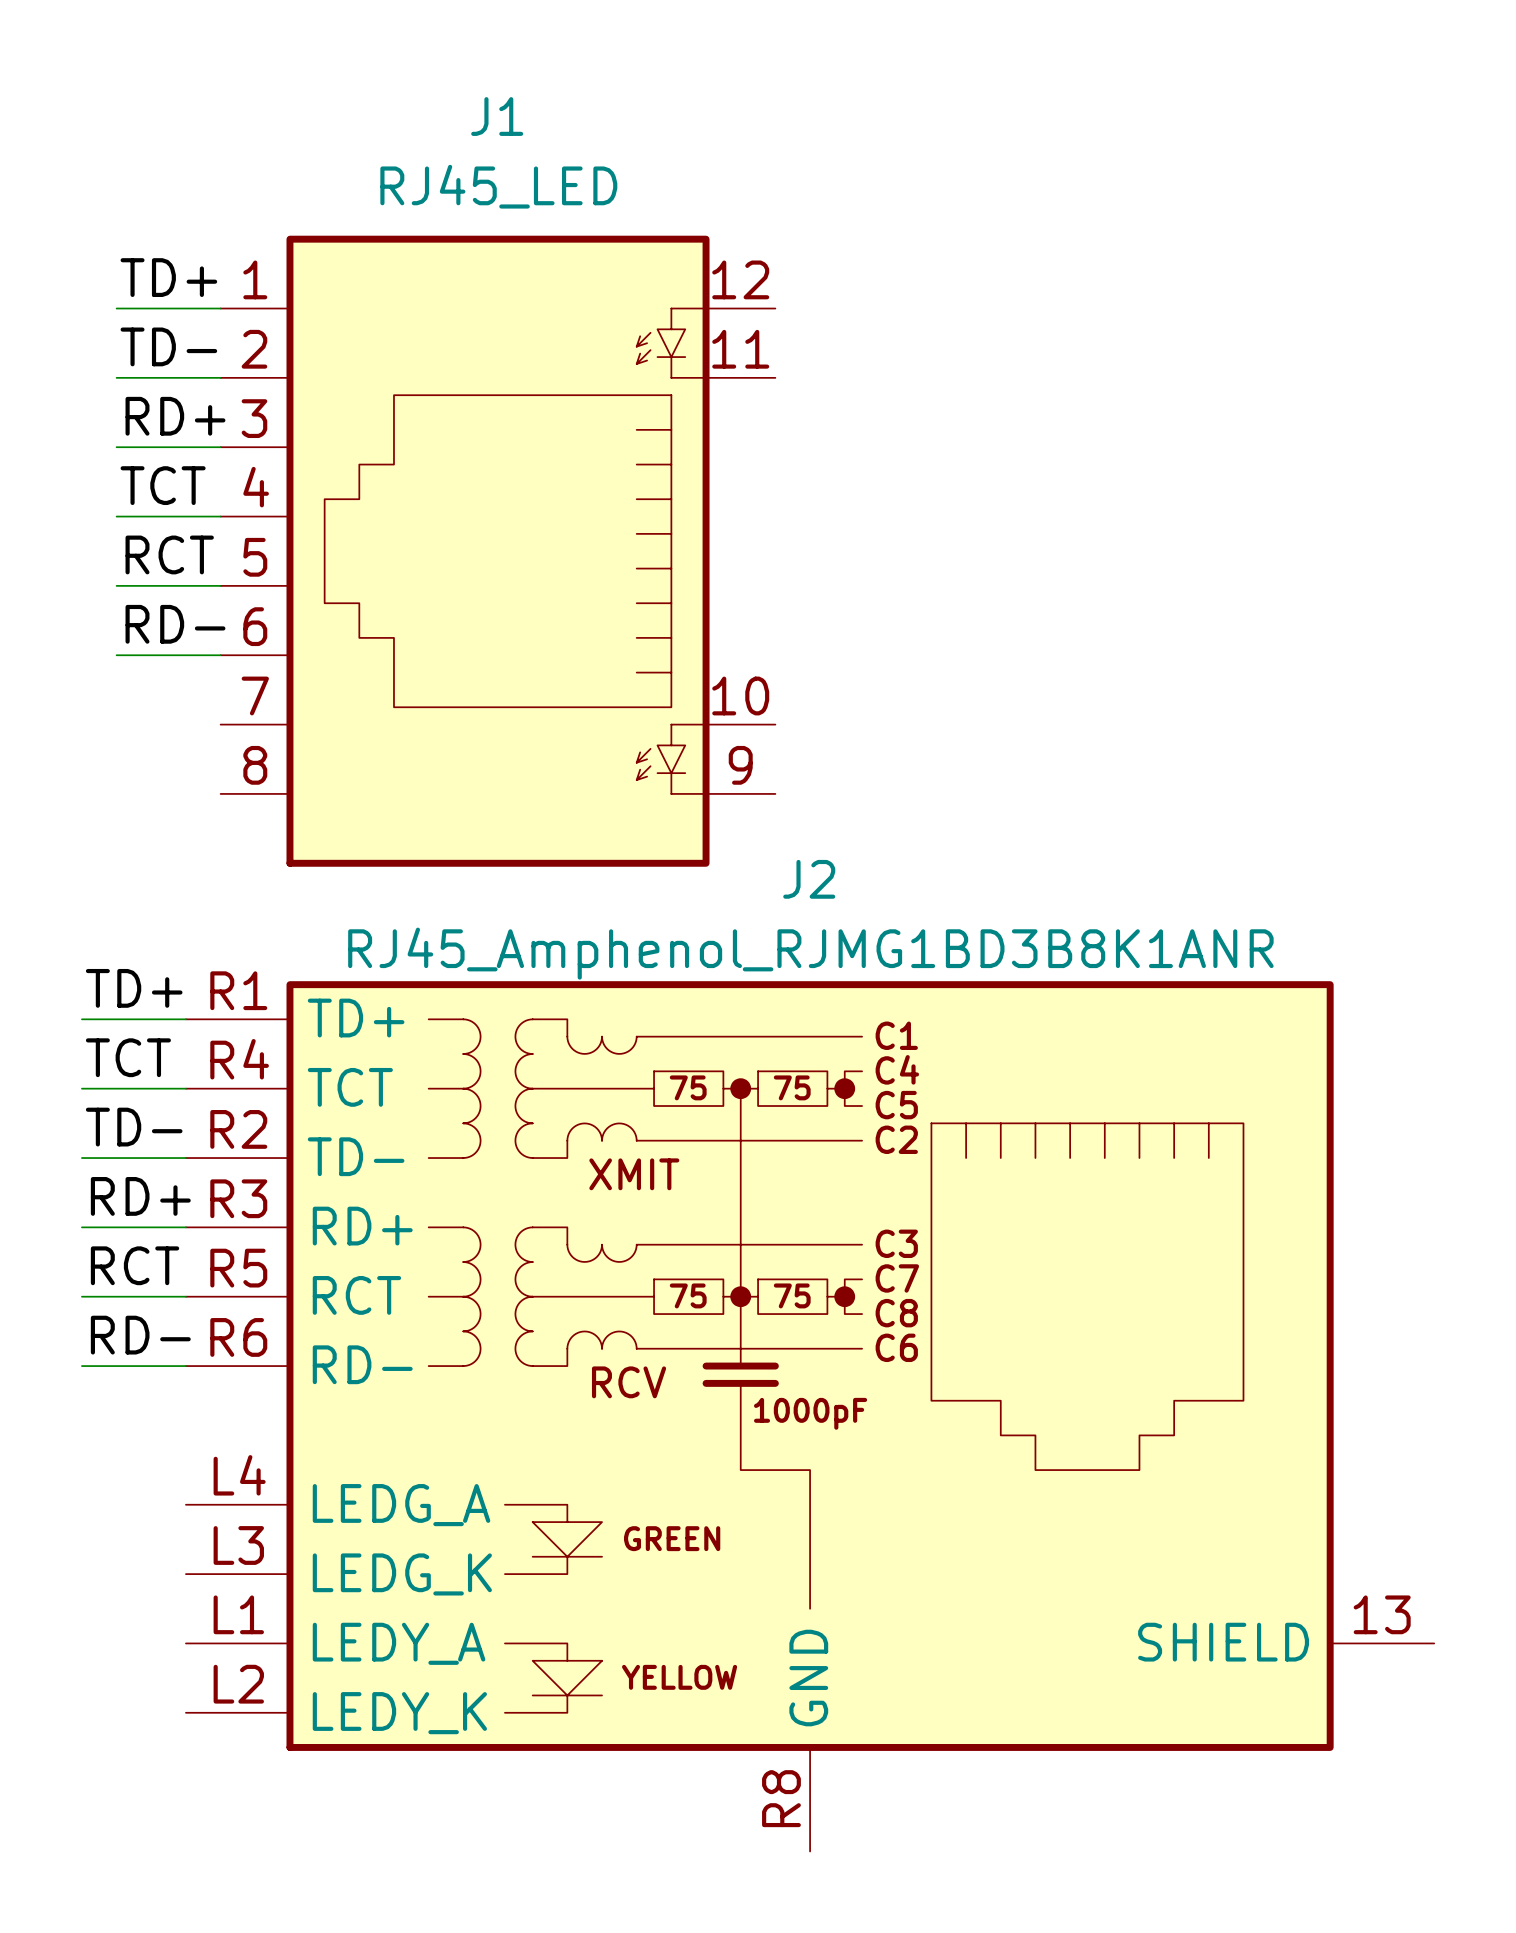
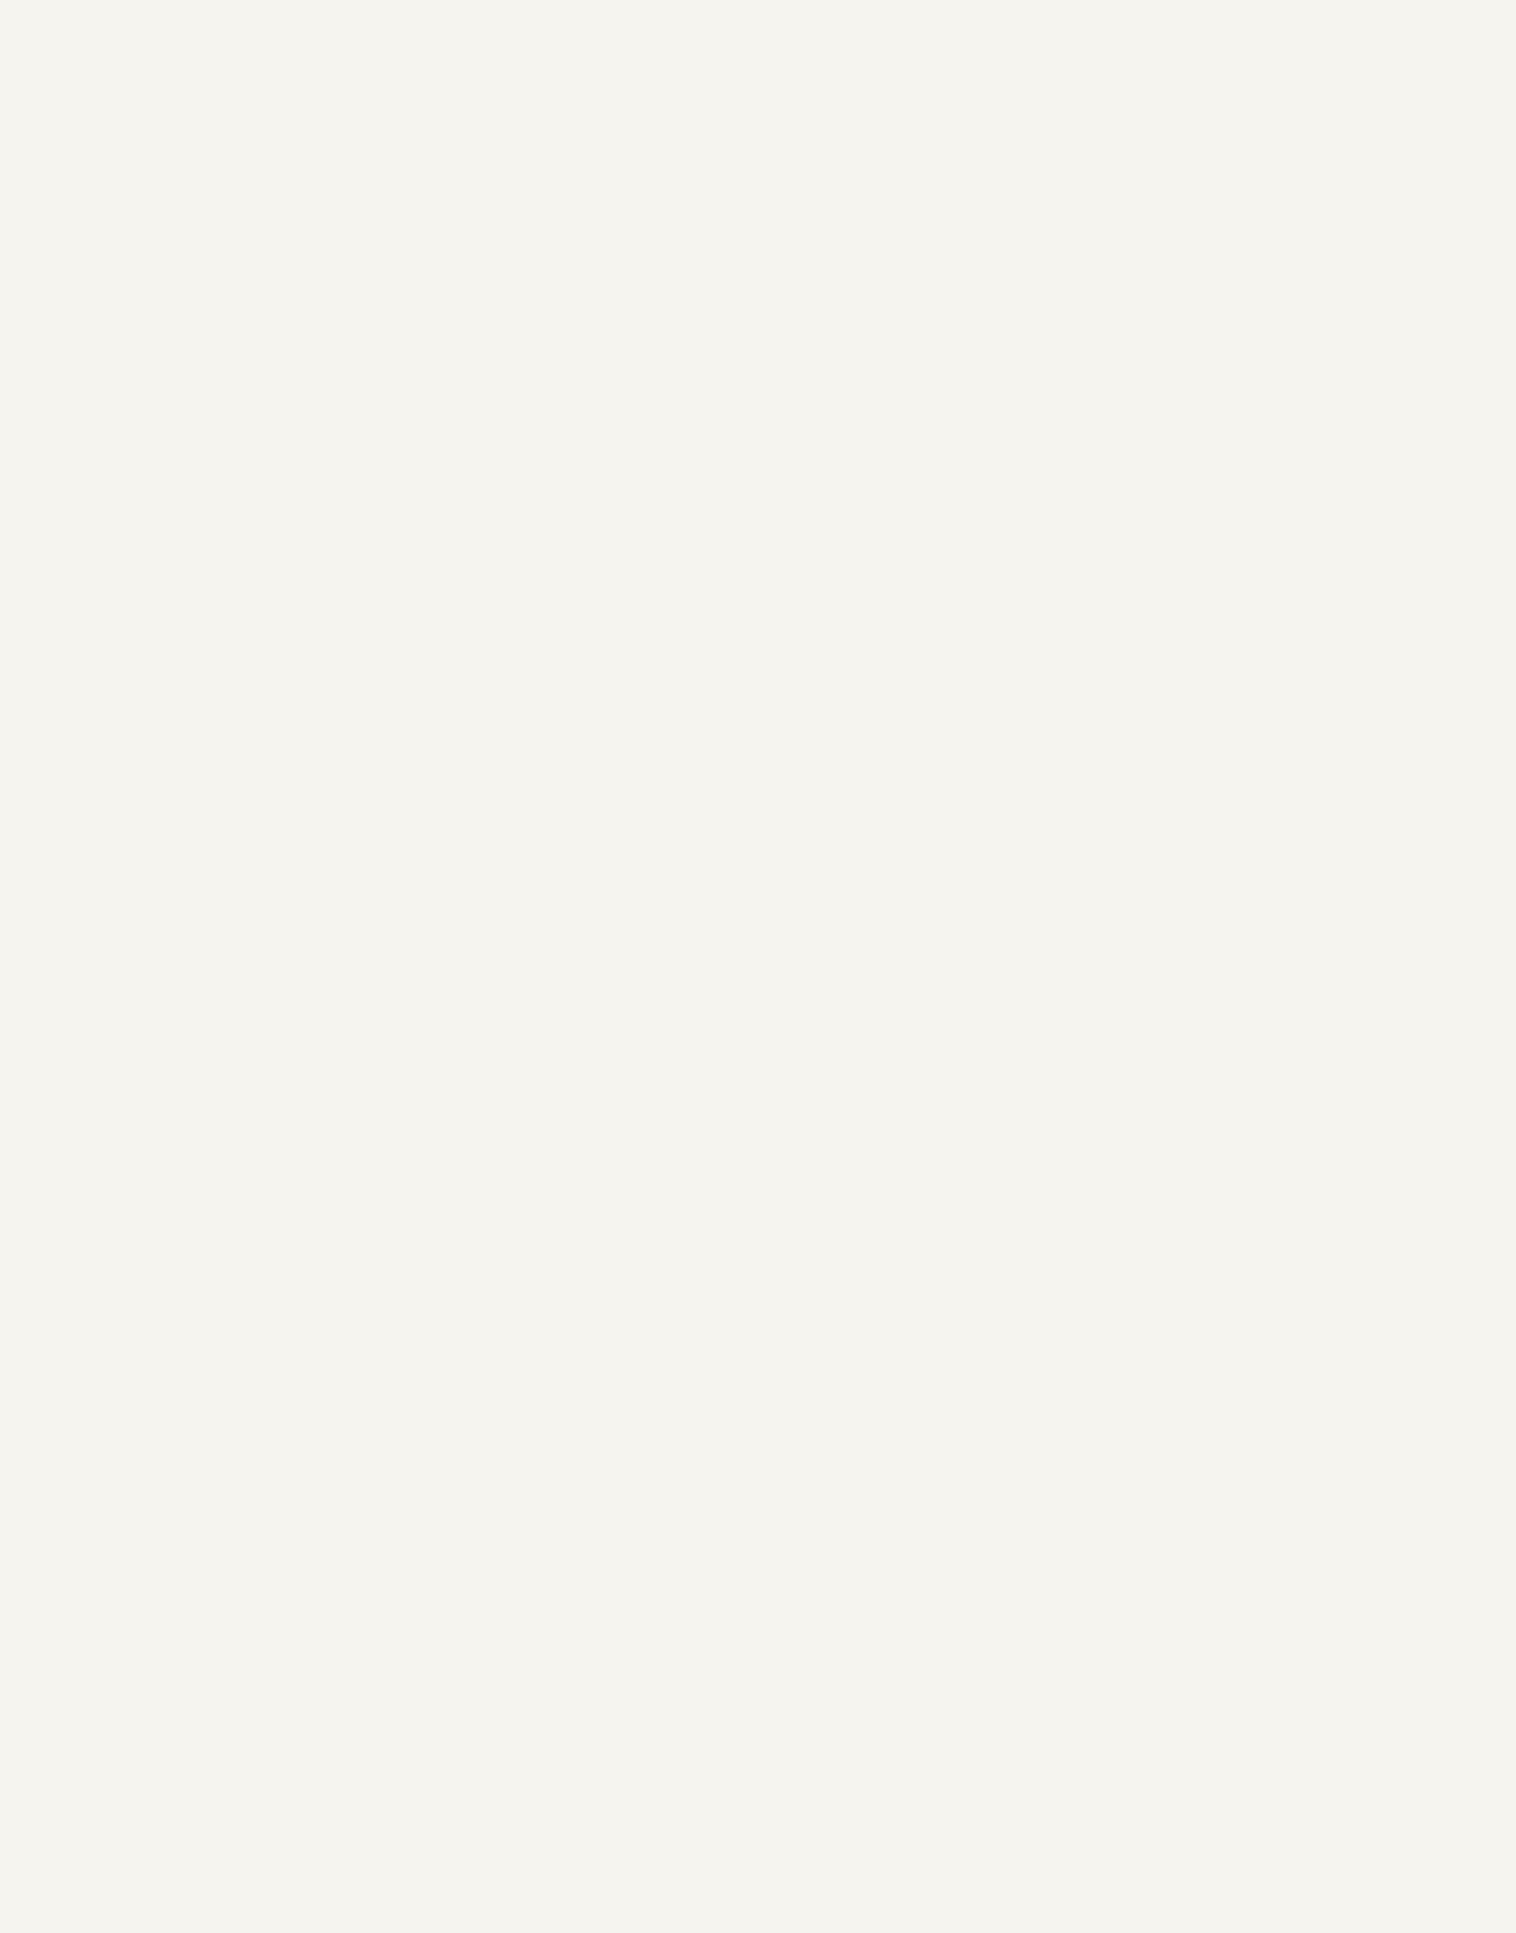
label: TD+ (168, 277) -> none
wire: (116, 308) (220, 308) -> none
label: TD- (168, 346) -> none
wire: (116, 377) (220, 377) -> none
label: RD+ (175, 416) -> none
wire: (116, 447) (220, 447) -> none
label: TCT (163, 485) -> none
wire: (116, 516) (220, 516) -> none
J1: RJ45_LED (498, 551) -> none
label: RCT (169, 554) -> none
wire: (116, 585) (220, 585) -> none
label: RD- (175, 624) -> none
wire: (116, 655) (220, 655) -> none
label: TD+ (134, 988) -> none
wire: (81, 1019) (185, 1019) -> none
label: TCT (128, 1057) -> none
wire: (81, 1088) (185, 1088) -> none
label: TD- (134, 1127) -> none
wire: (81, 1158) (185, 1158) -> none
label: RD+ (140, 1196) -> none
wire: (81, 1227) (185, 1227) -> none
label: RCT (135, 1265) -> none
wire: (81, 1296) (185, 1296) -> none
label: RD- (140, 1335) -> none
wire: (81, 1366) (185, 1366) -> none
J2: RJ45_Amphenol_RJMG1BD3B8K1ANR (810, 1416) -> none

